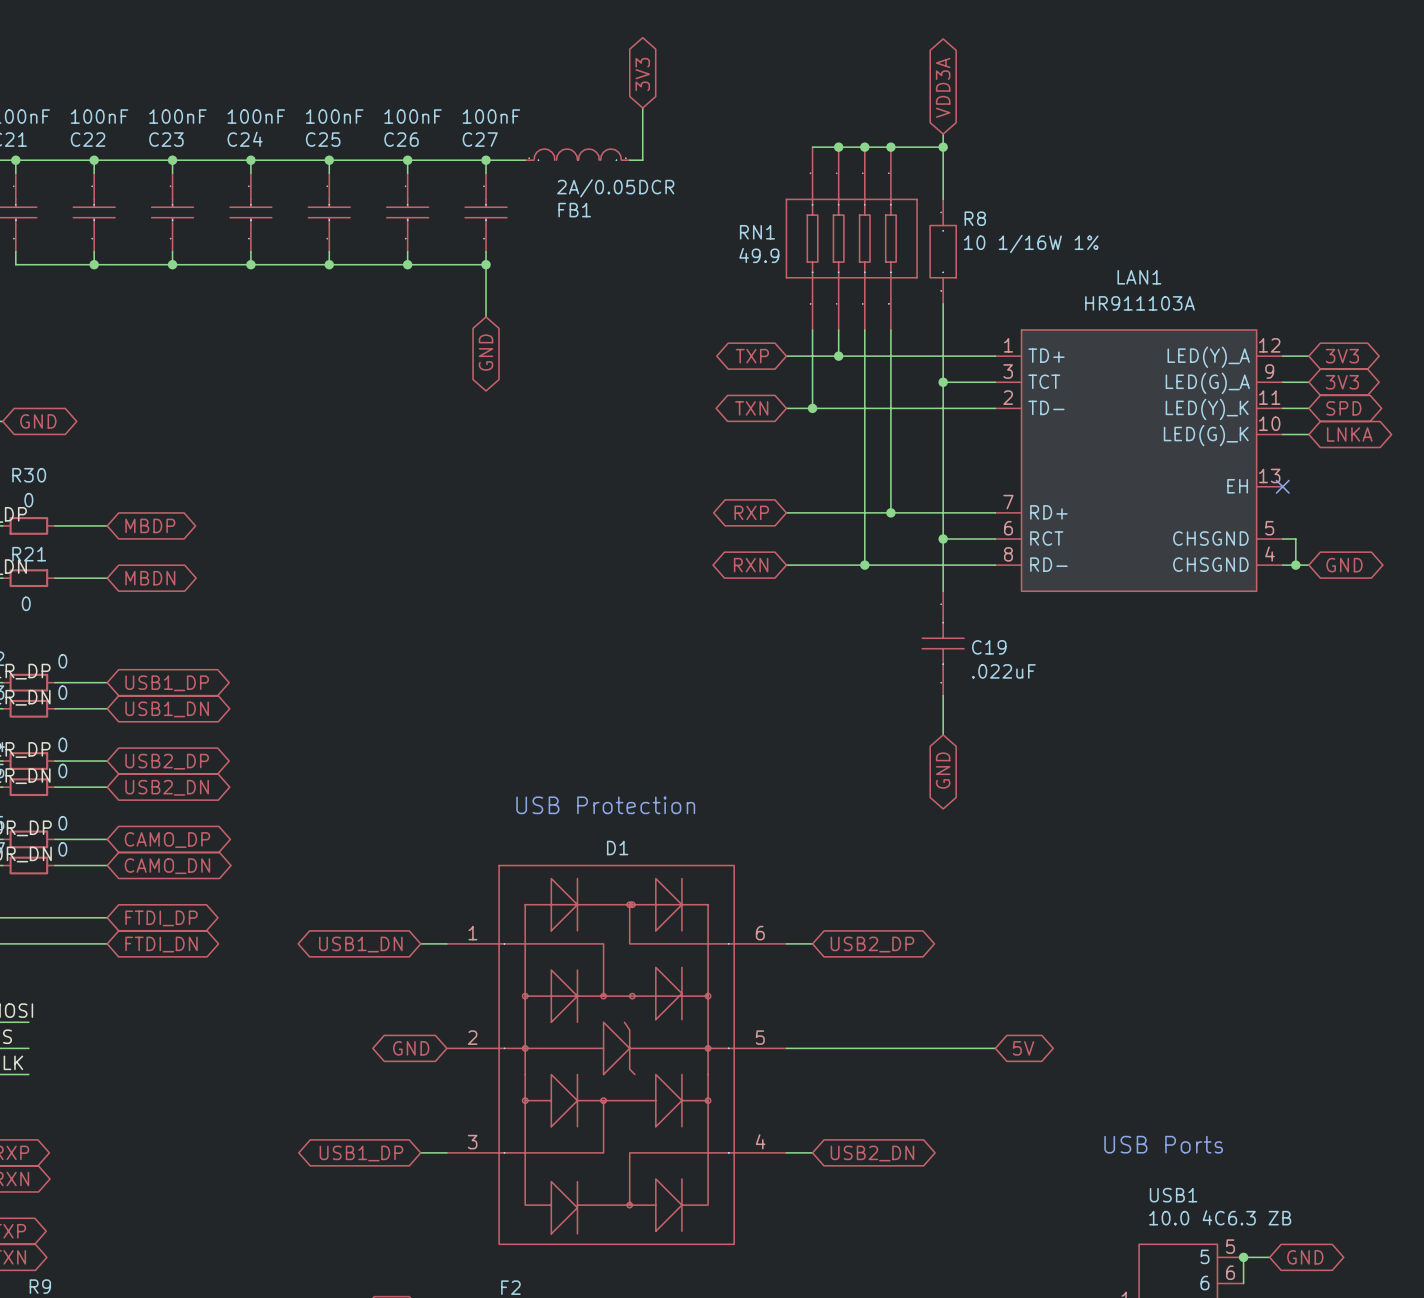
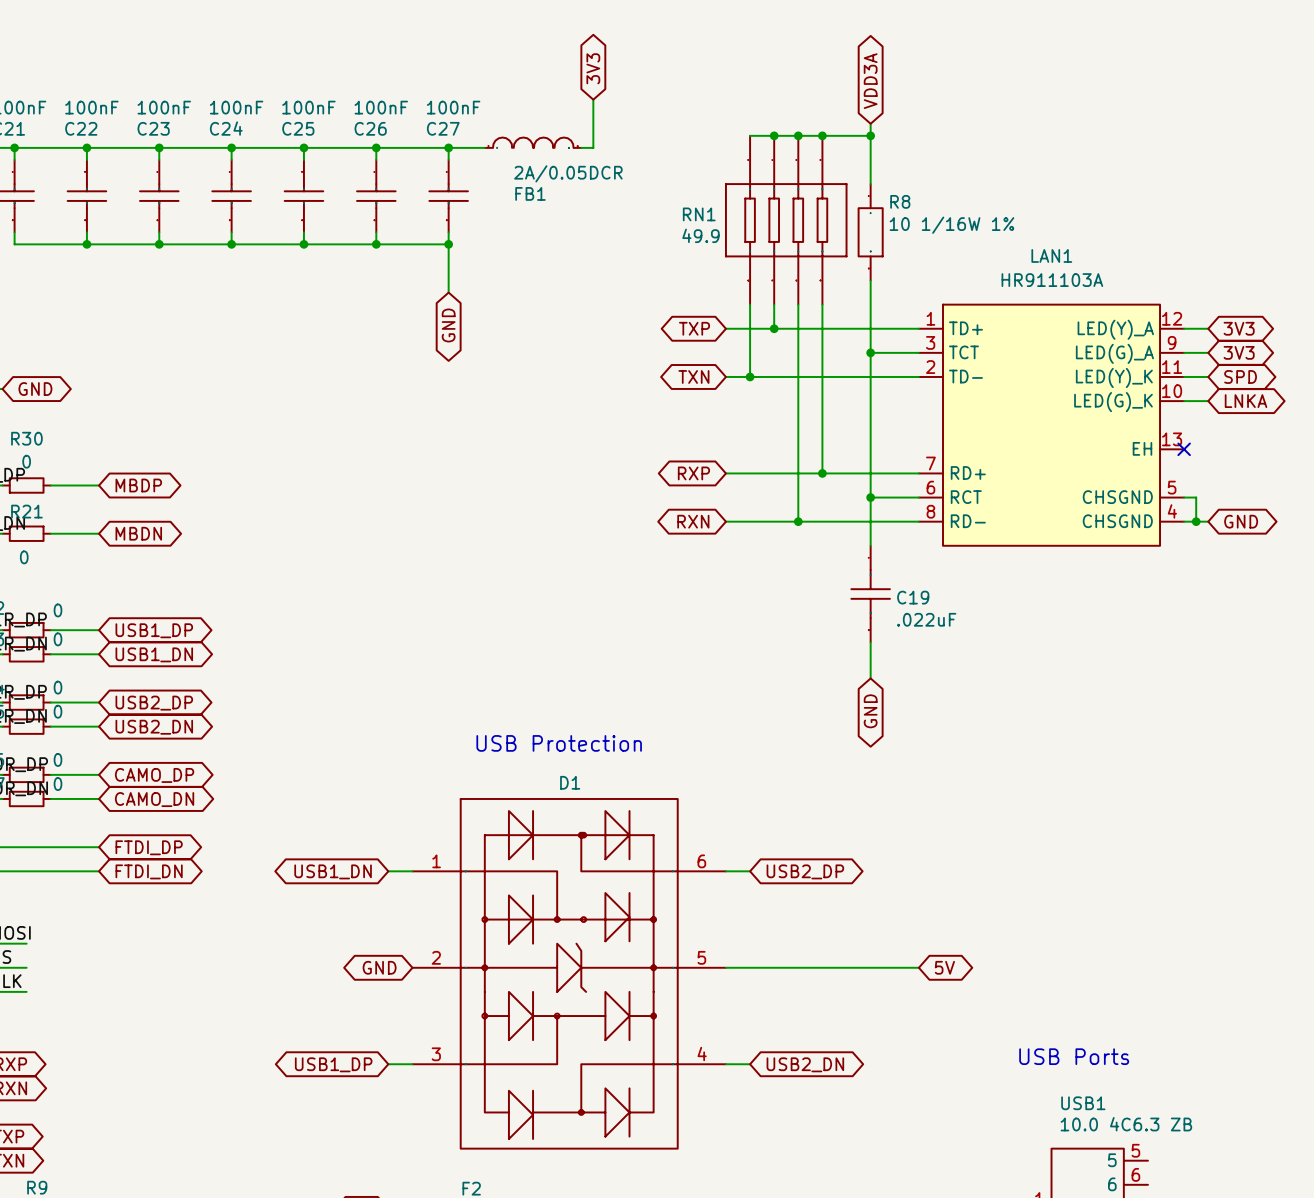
junction: (1243, 1257) -> none
wire: (1269, 1257) (1243, 1257) (1243, 1283) -> none
global label: GND (1305, 1257) -> none

